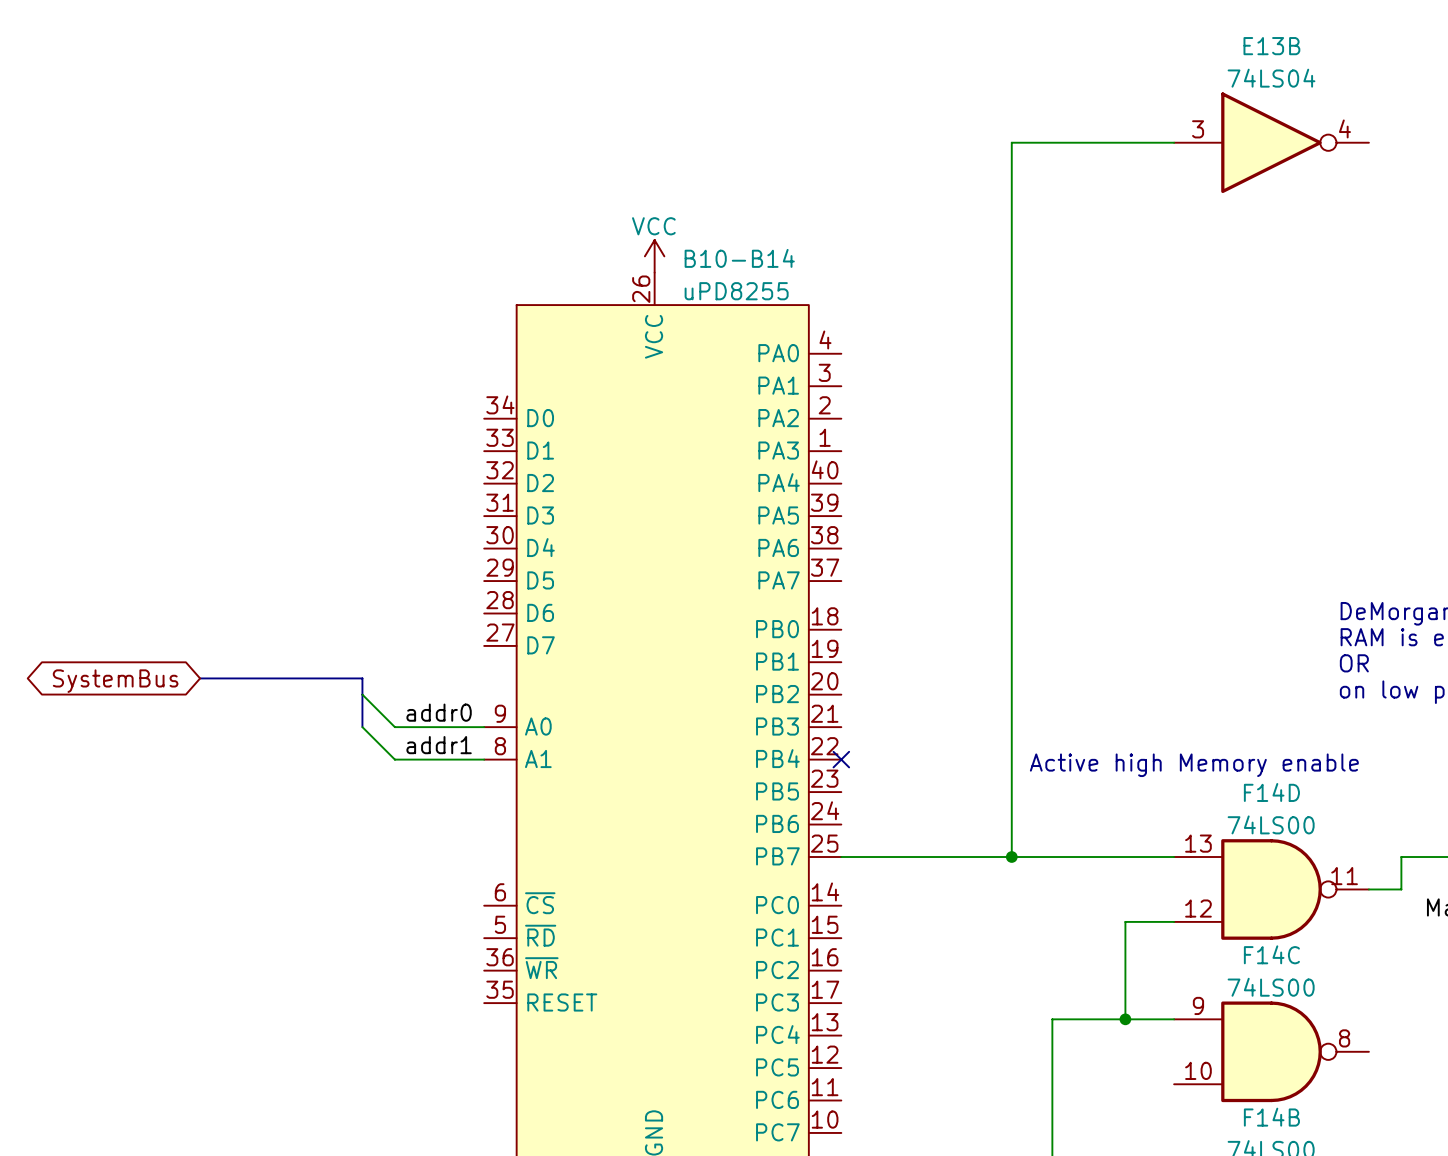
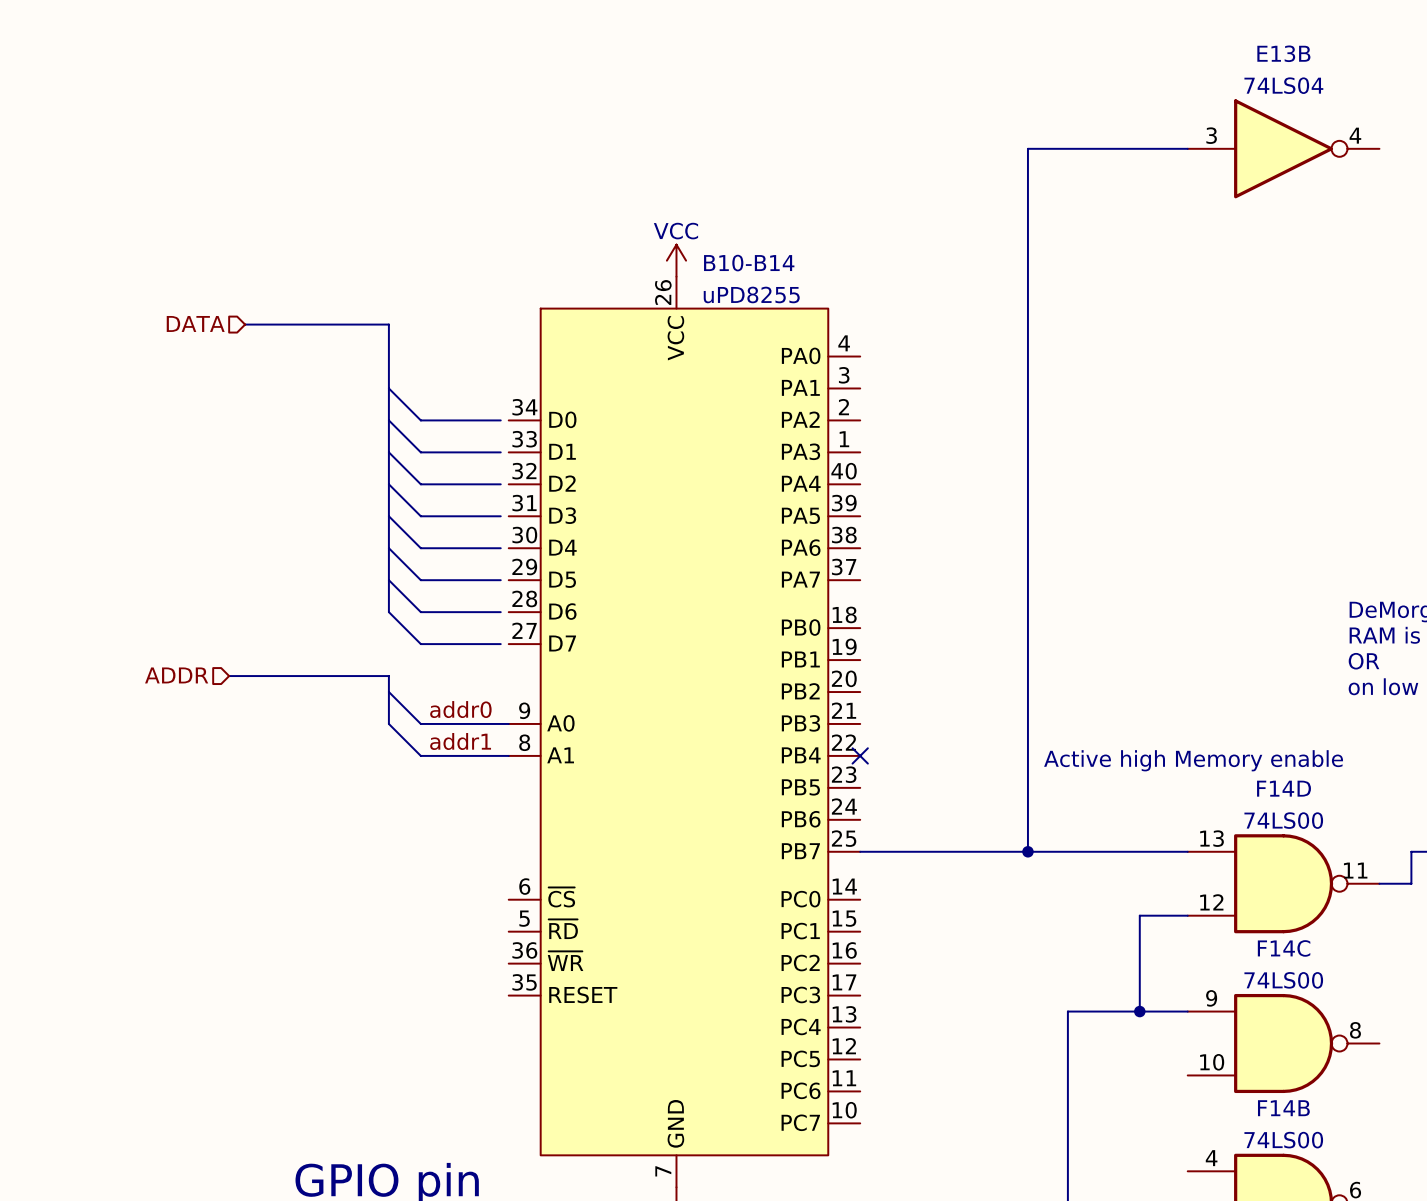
hierarchical label: none -> DATA (195, 323)
bus: none -> (245, 324) (388, 324) (388, 612)
wire: none -> (388, 388) (420, 420) (500, 420)
wire: none -> (388, 420) (420, 452) (500, 452)
wire: none -> (388, 452) (420, 484) (500, 484)
wire: none -> (388, 484) (420, 516) (500, 516)
wire: none -> (388, 516) (420, 548) (500, 548)
wire: none -> (388, 548) (420, 580) (500, 580)
wire: none -> (388, 580) (420, 612) (500, 612)
wire: none -> (388, 612) (420, 644) (500, 644)
hierarchical label: none -> ADDR (176, 675)
global label: SystemBus (115, 681) -> none

